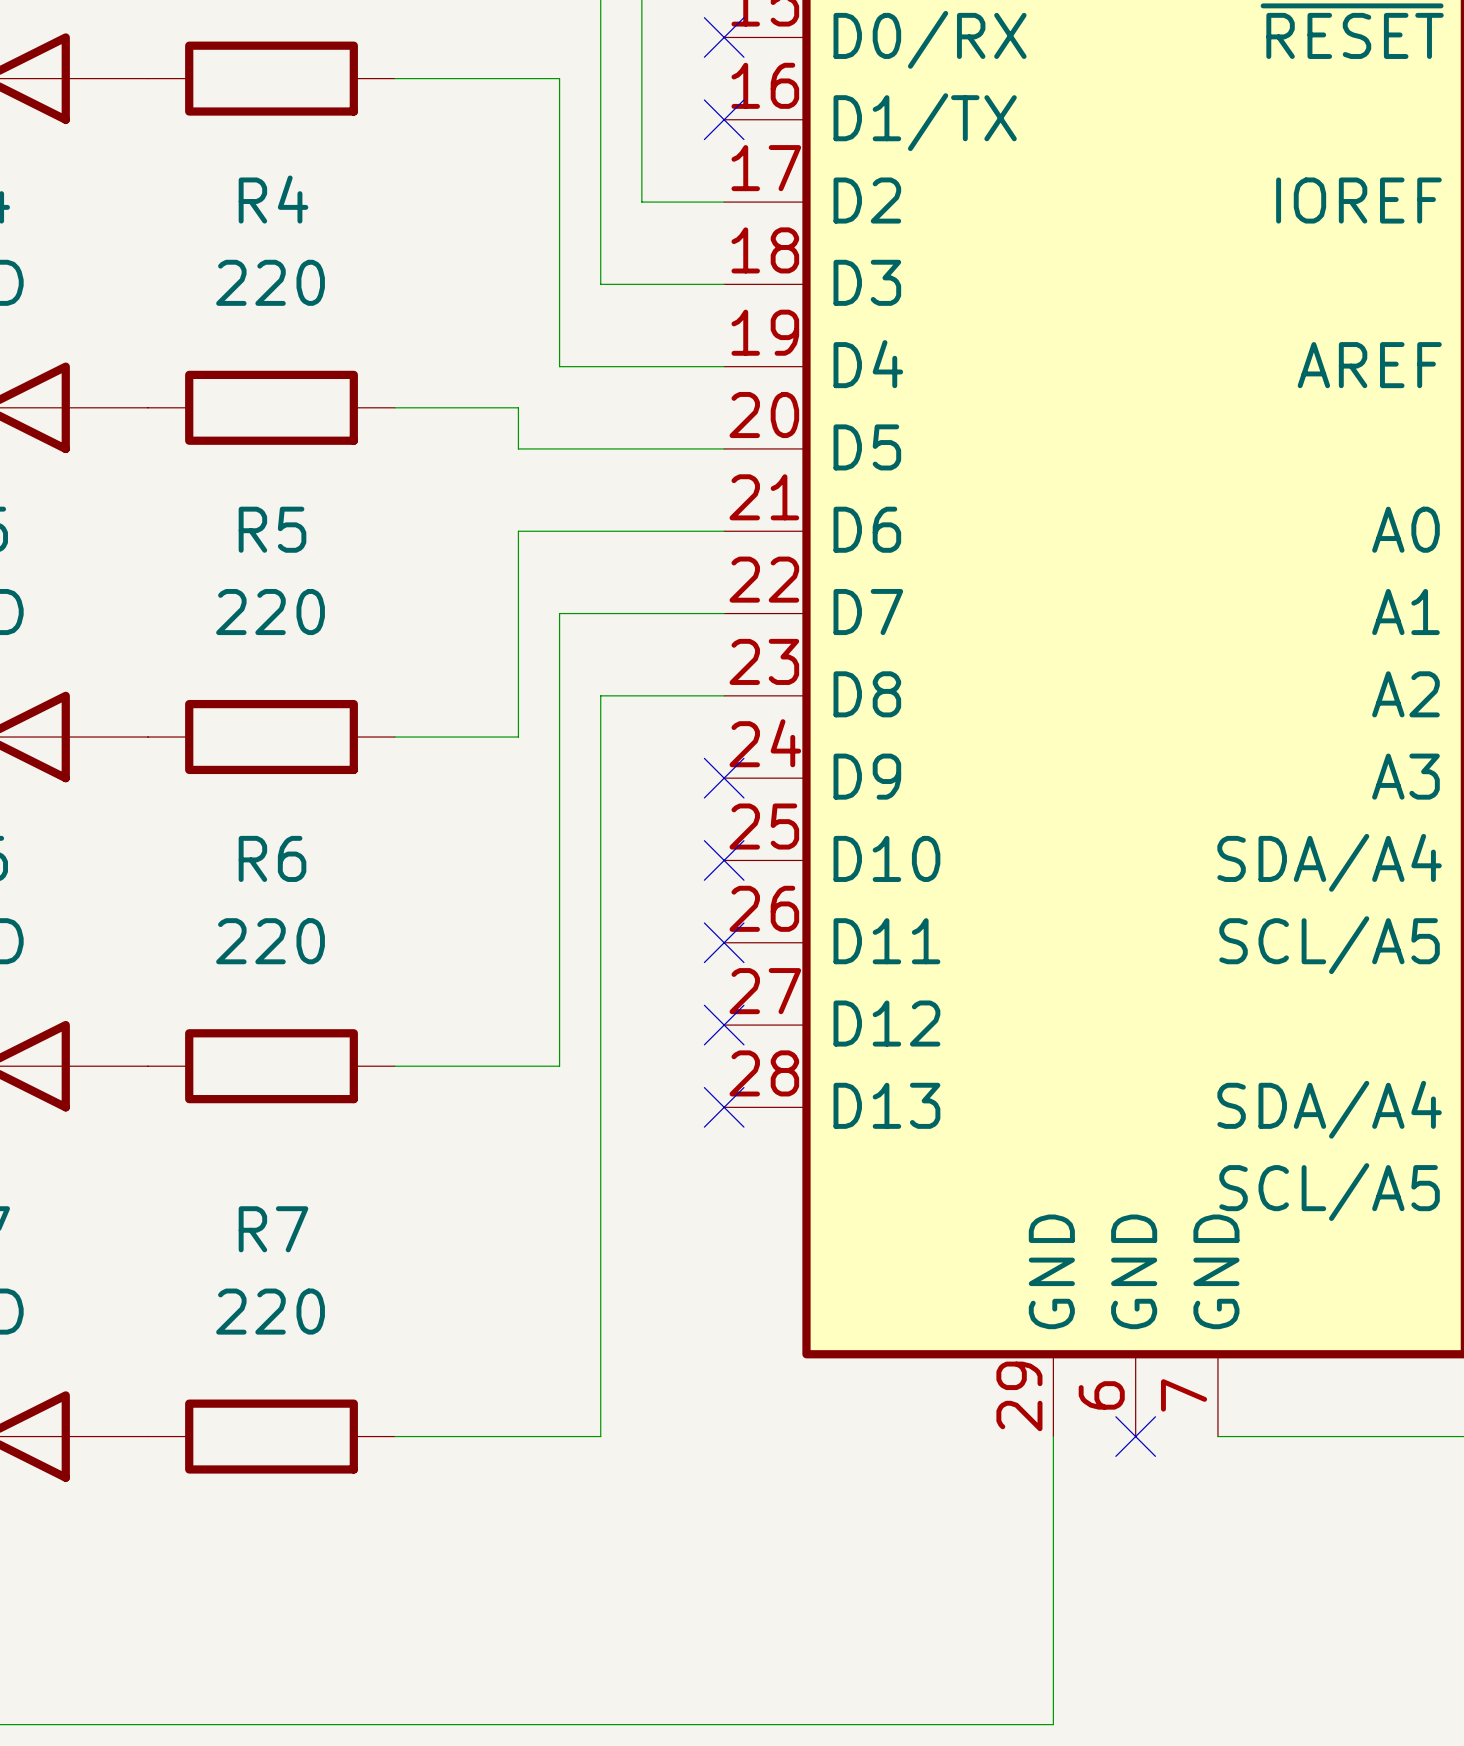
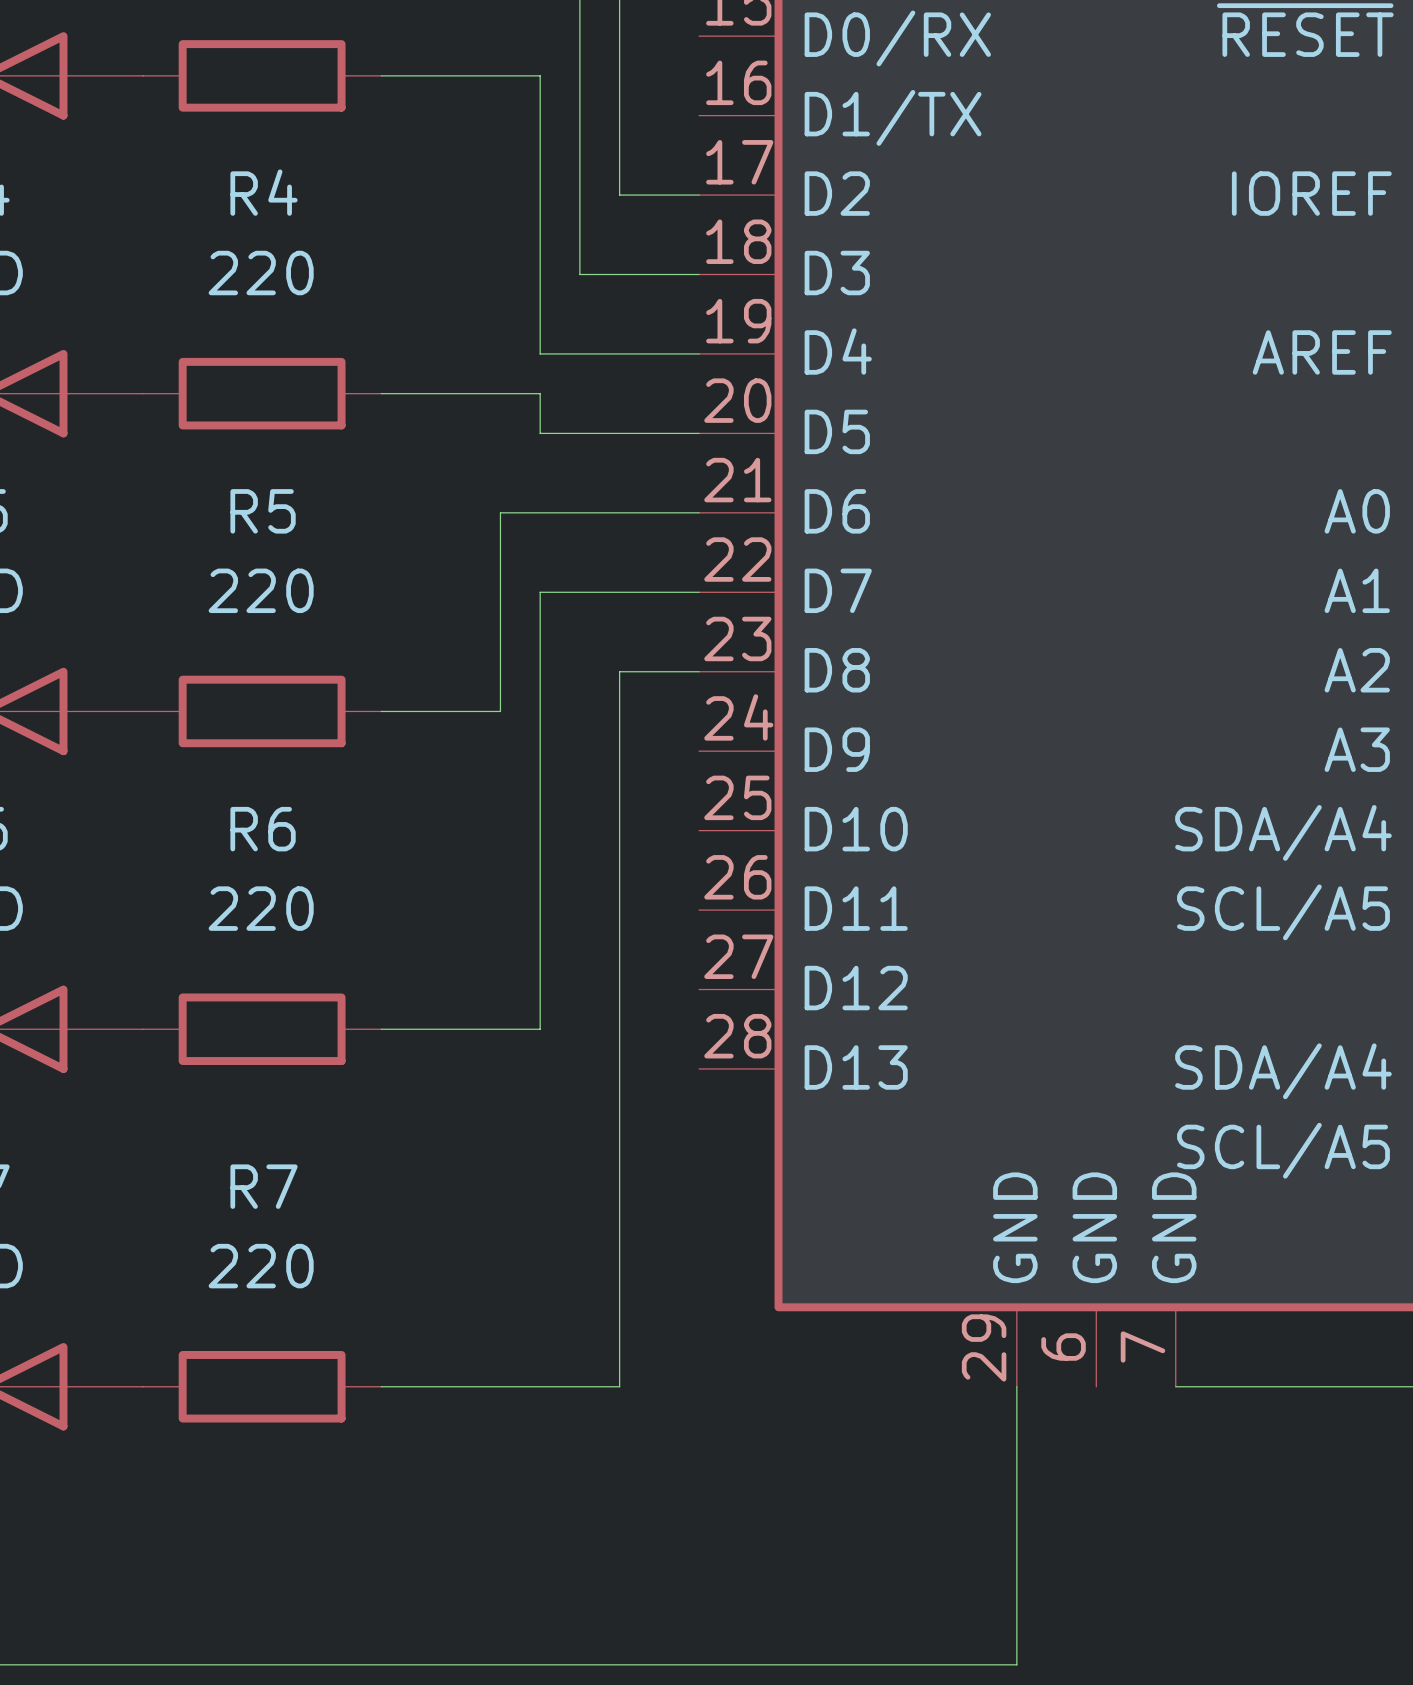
no-connect mark: (724, 37) -> none
no-connect mark: (724, 119) -> none
wire: (518, 407) (518, 448) (559, 448) -> (500, 393) (540, 393) (540, 433)
wire: (641, 695) (600, 695) (600, 1436) -> (619, 671) (619, 1386) (579, 1386)
no-connect mark: (724, 778) -> none
no-connect mark: (724, 860) -> none
no-connect mark: (724, 942) -> none
no-connect mark: (724, 1025) -> none
no-connect mark: (724, 1107) -> none
no-connect mark: (1135, 1436) -> none

